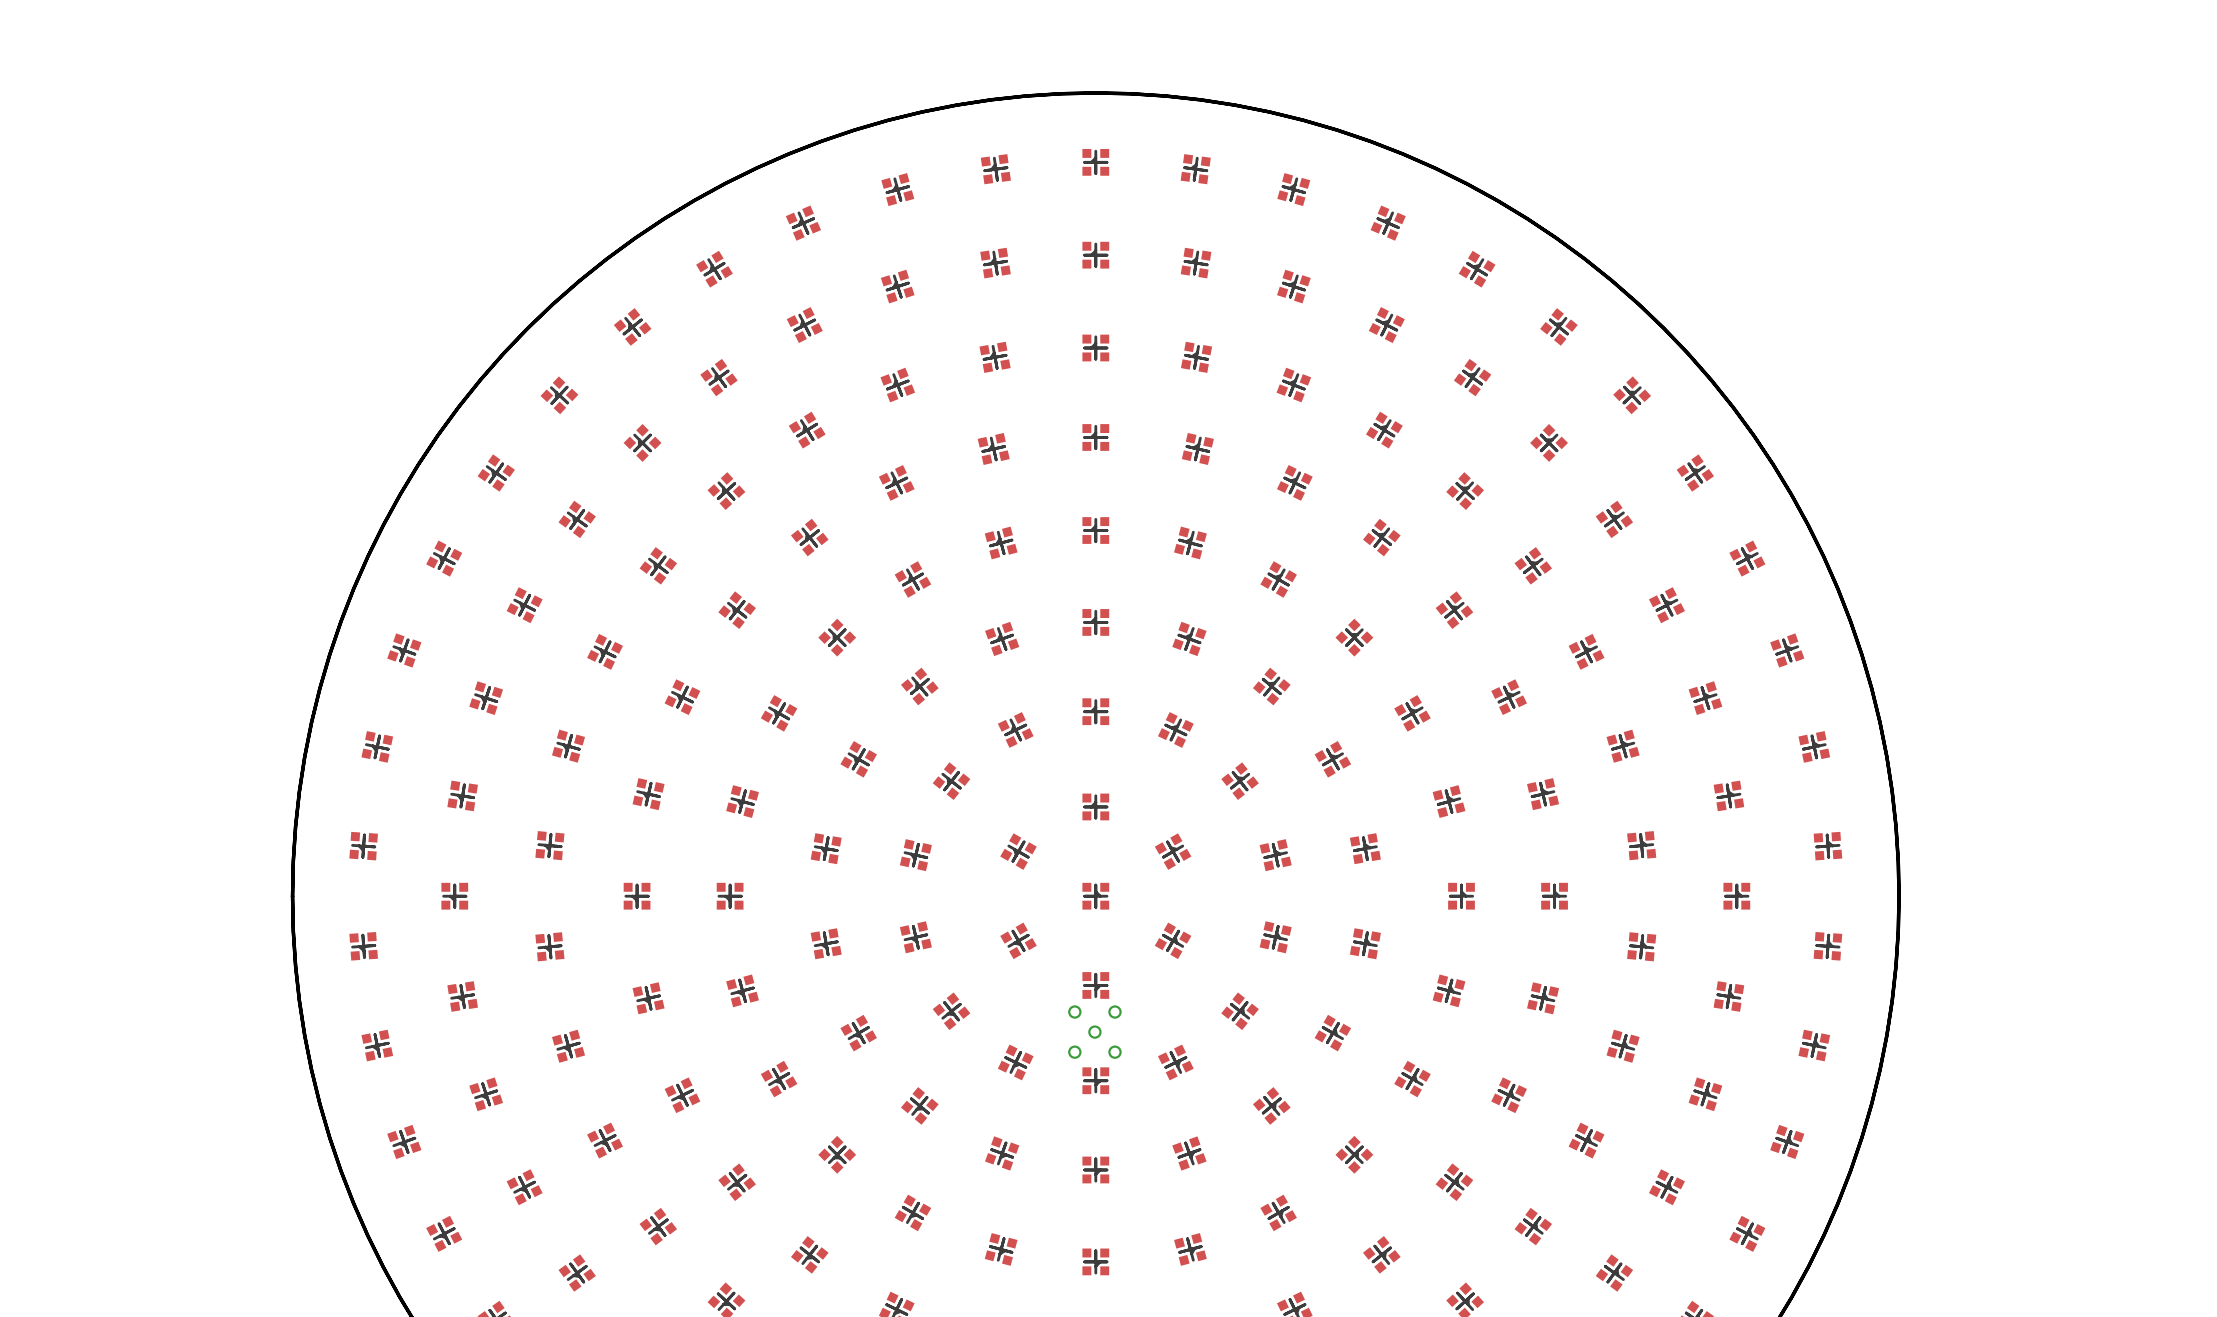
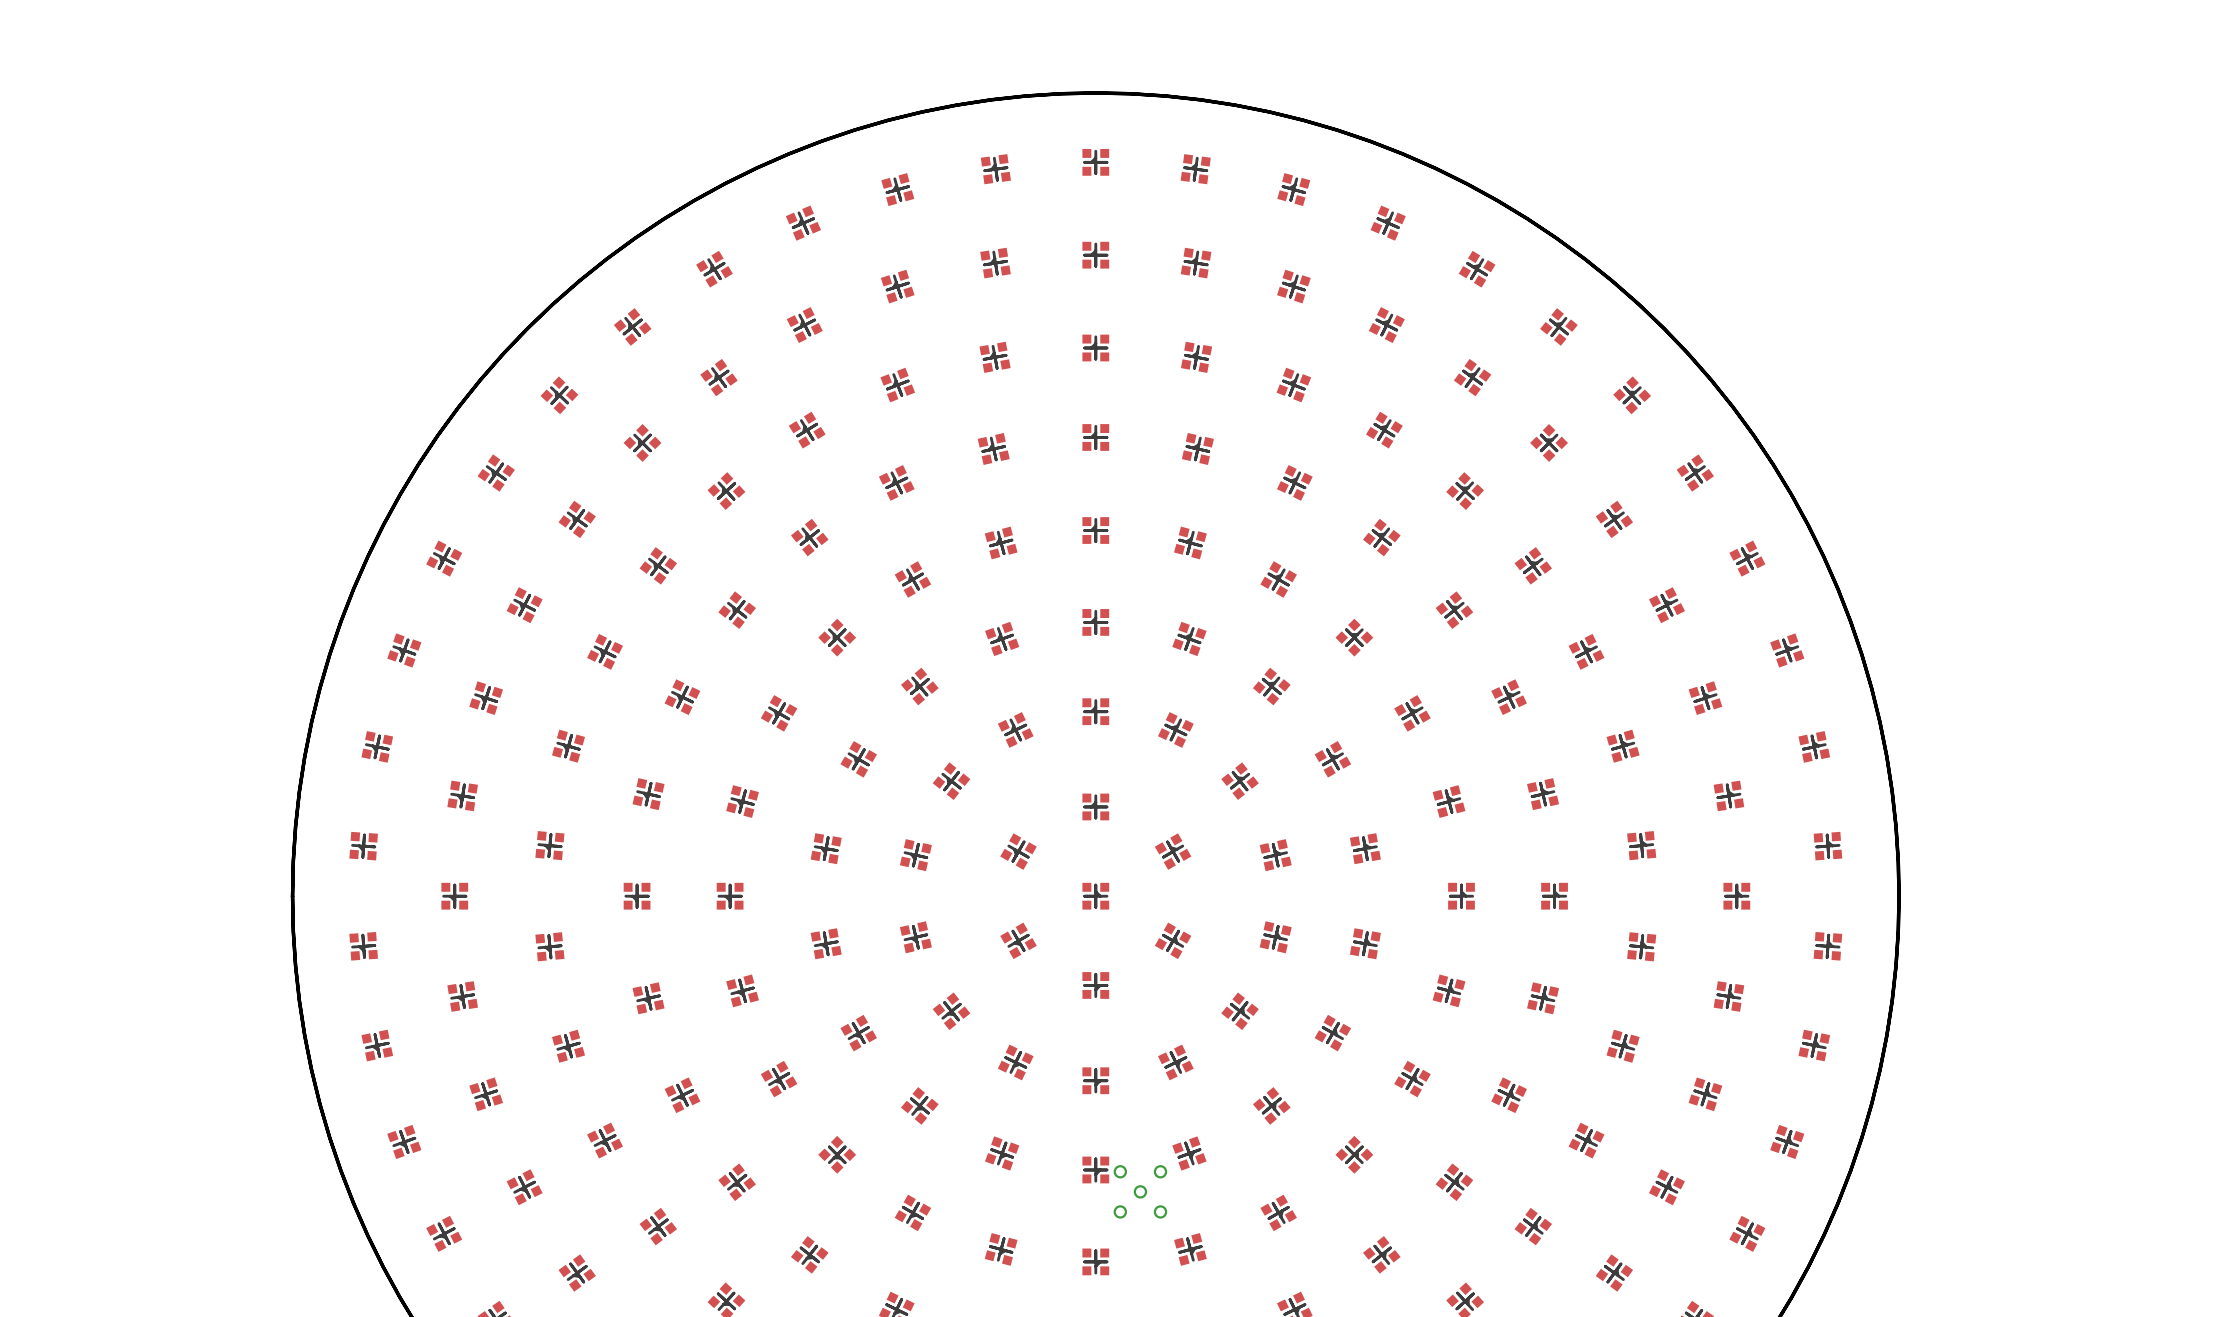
part position: (1094, 1032) -> (1140, 1191)

